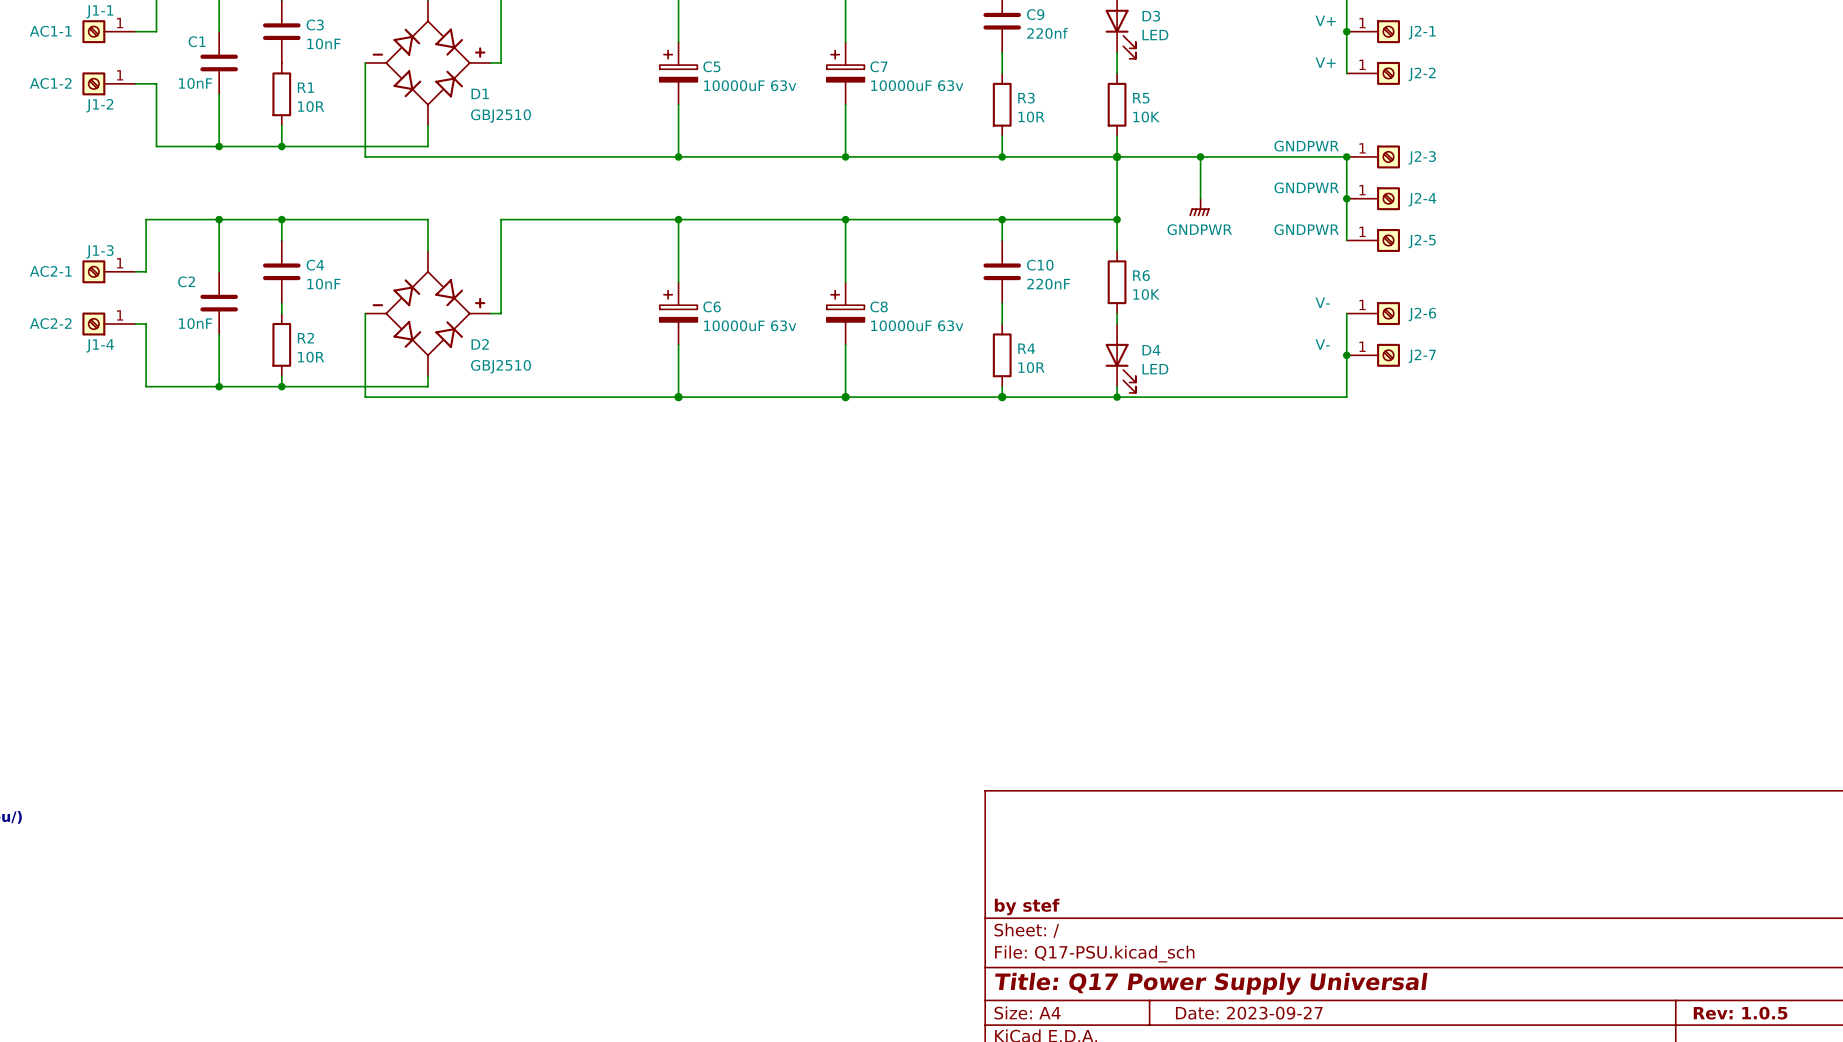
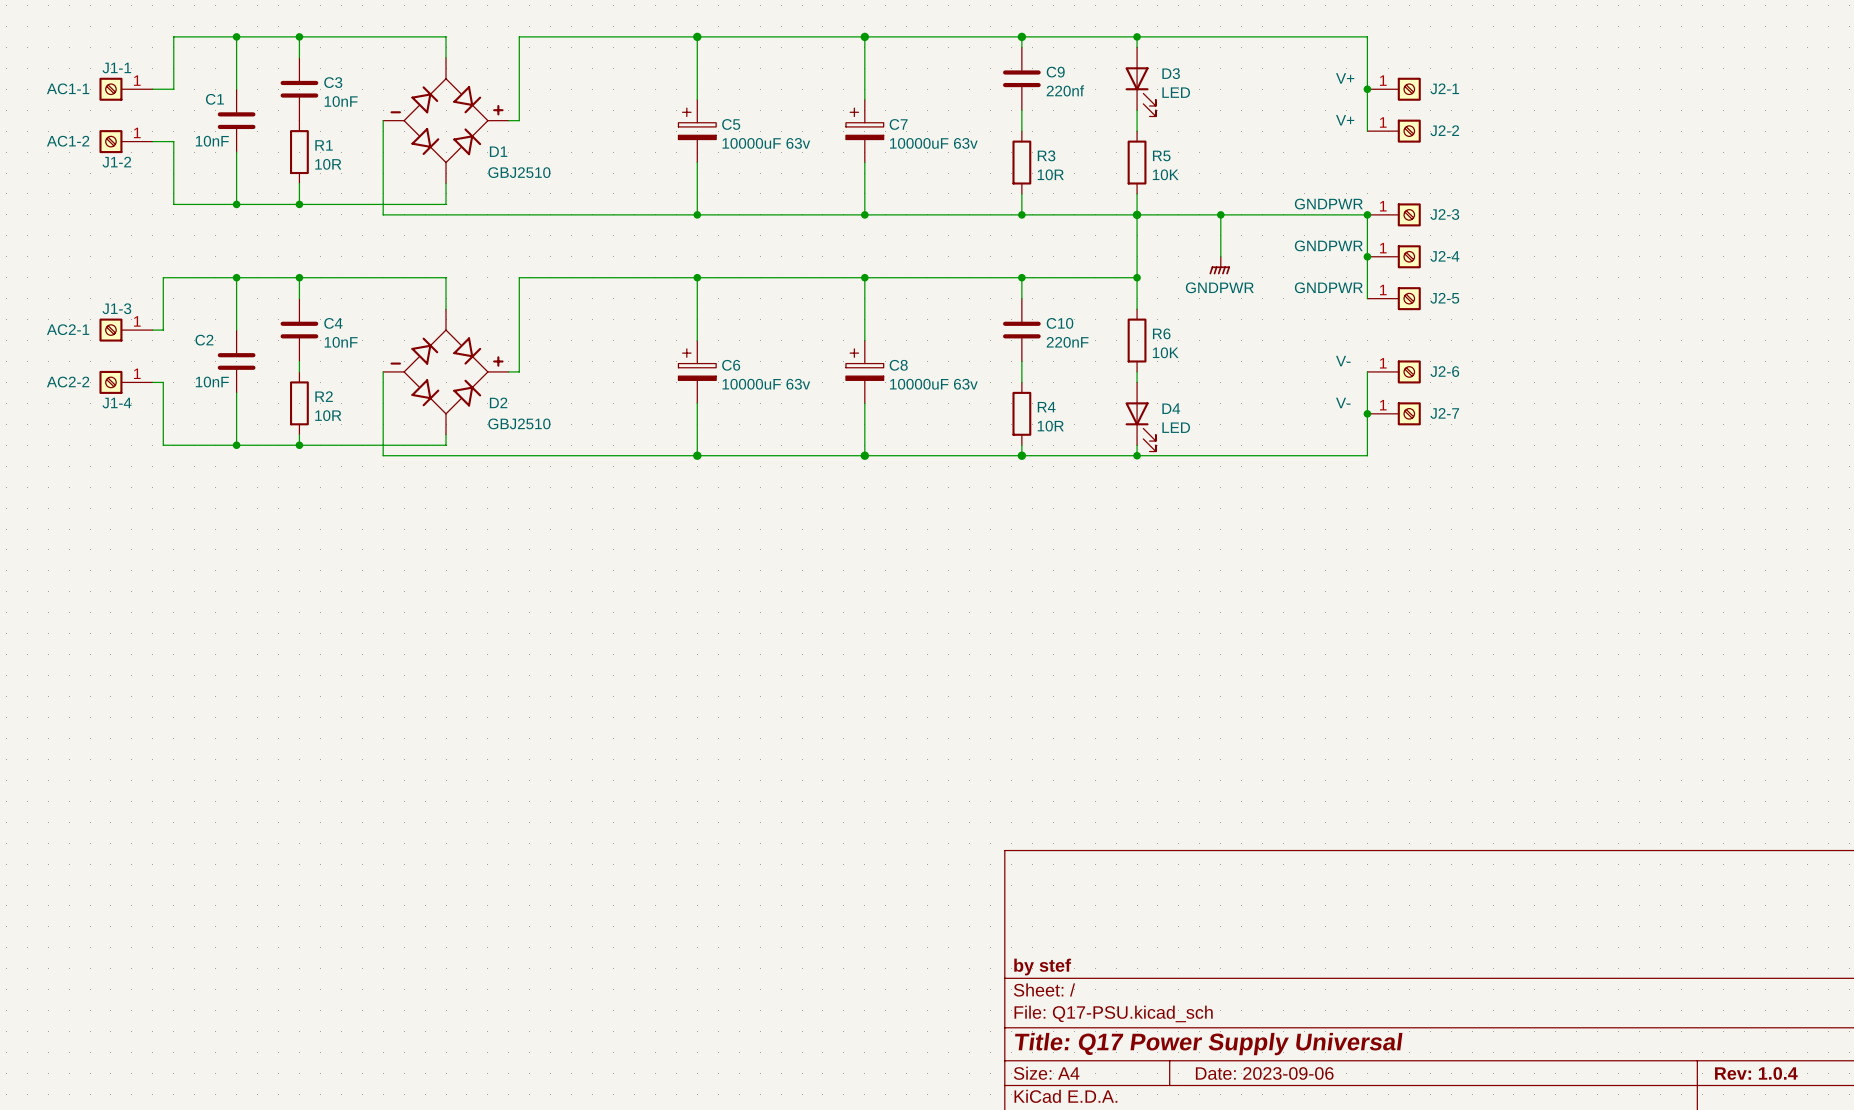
title block: Date: 2023-09-27 (1249, 1013) -> Date: 2023-09-06 (1264, 1073)
title block: Rev: 1.0.5 (1740, 1013) -> Rev: 1.0.4 (1756, 1073)

